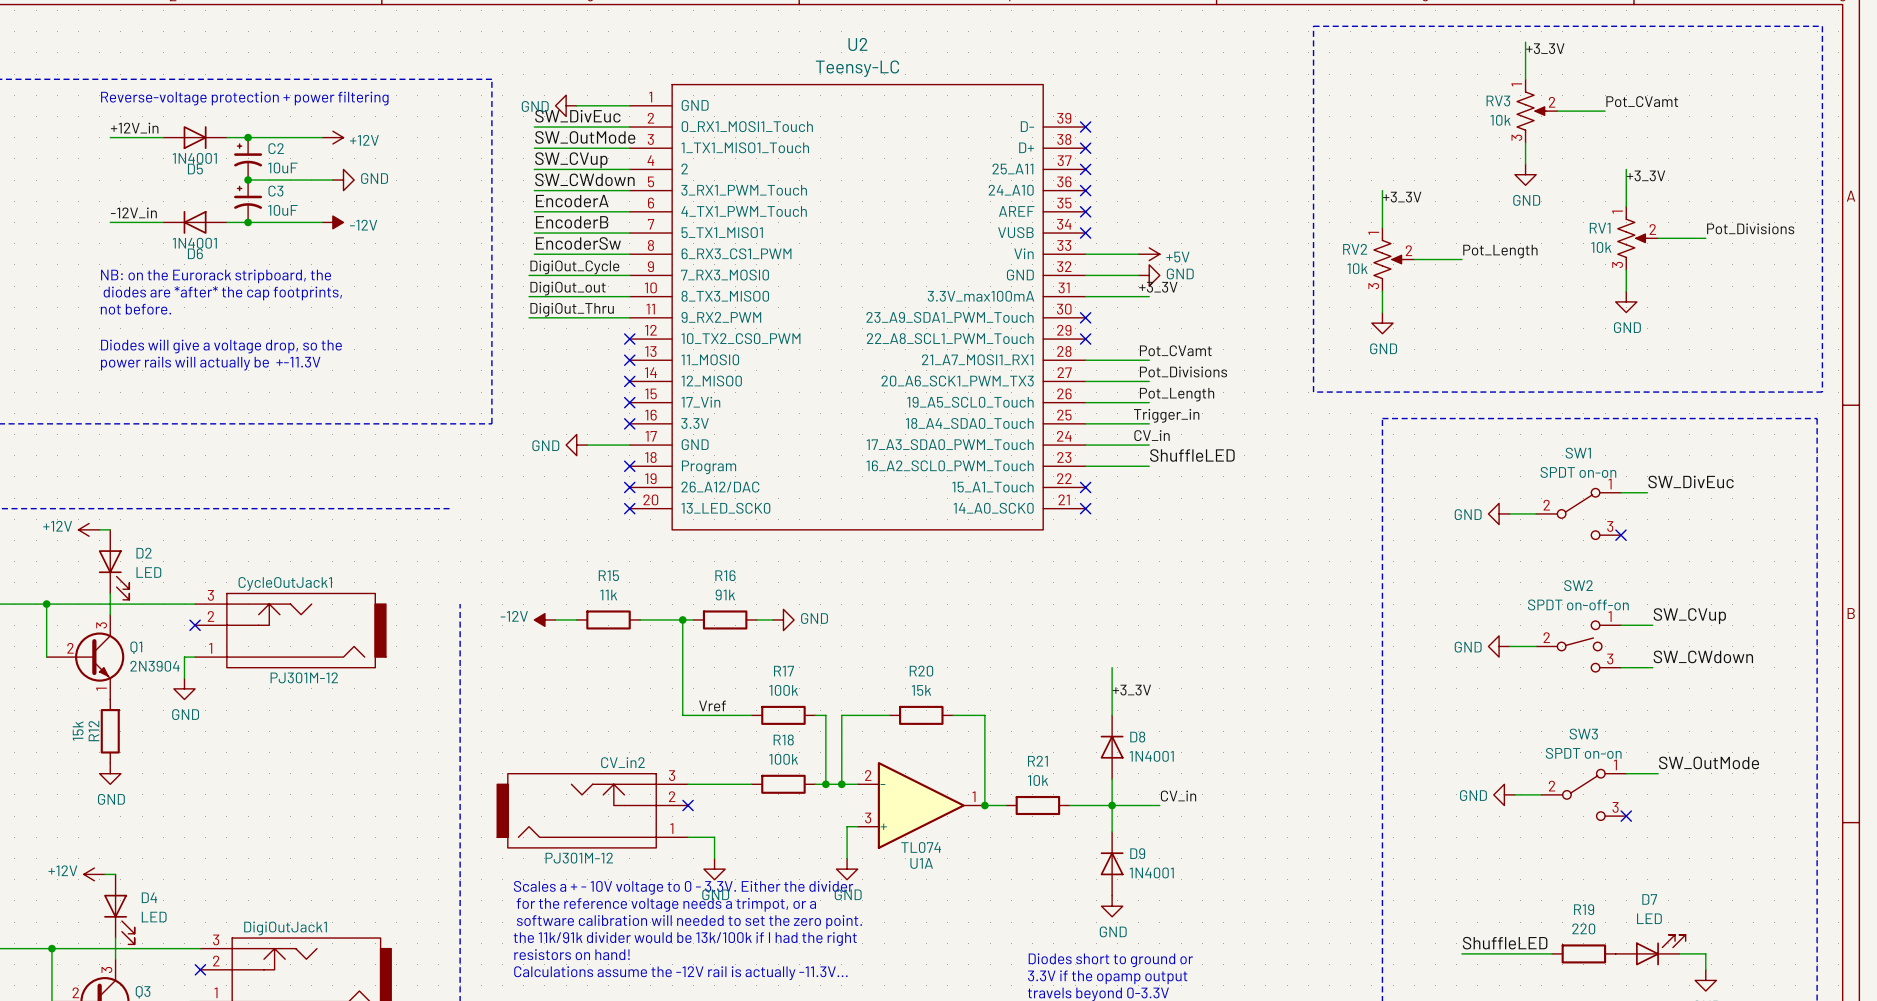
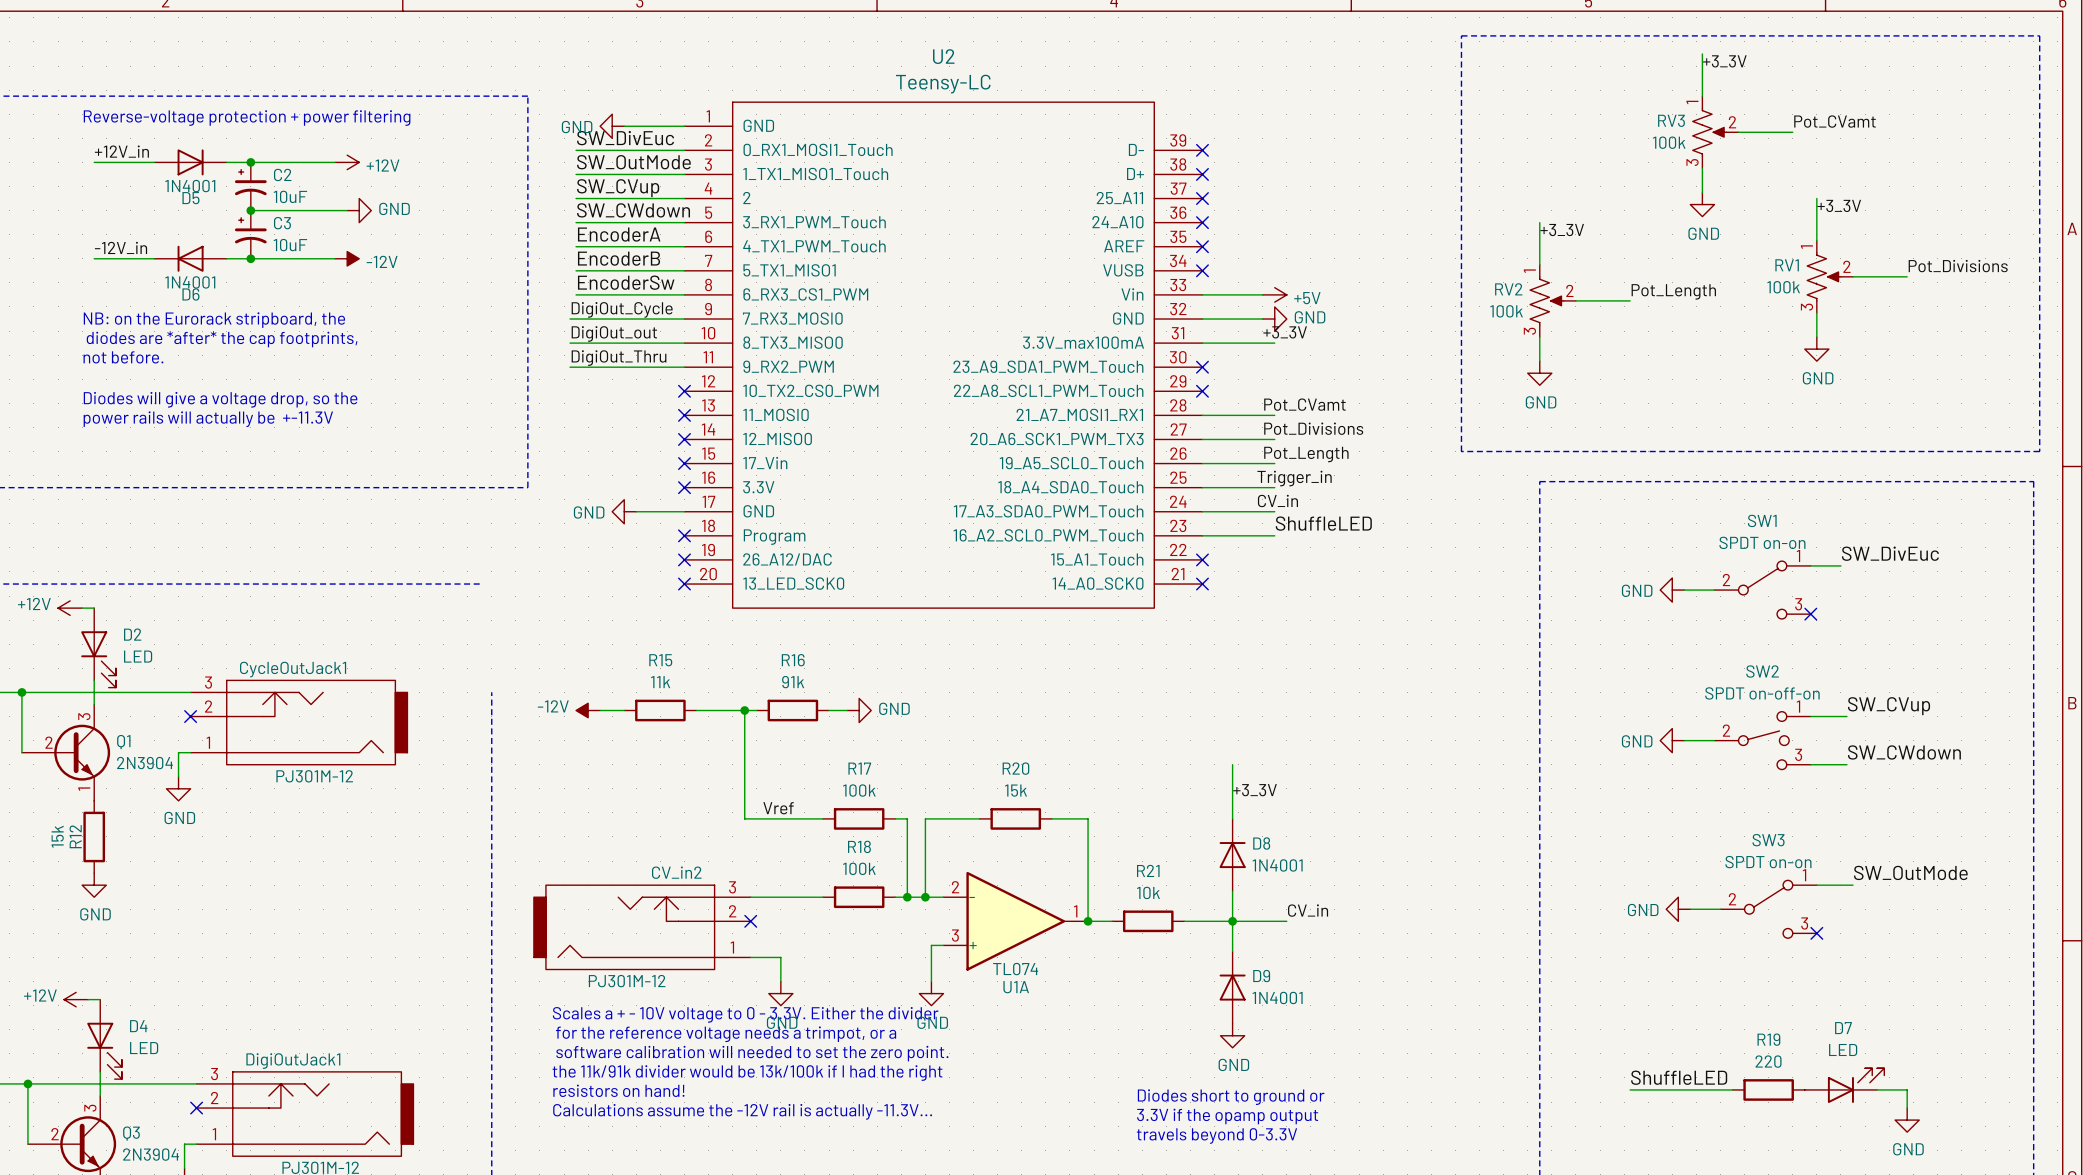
RV3 value: 10k (1500, 120) -> 100k (1669, 142)
RV1 value: 10k (1601, 247) -> 100k (1783, 287)
RV2 value: 10k (1357, 268) -> 100k (1506, 311)

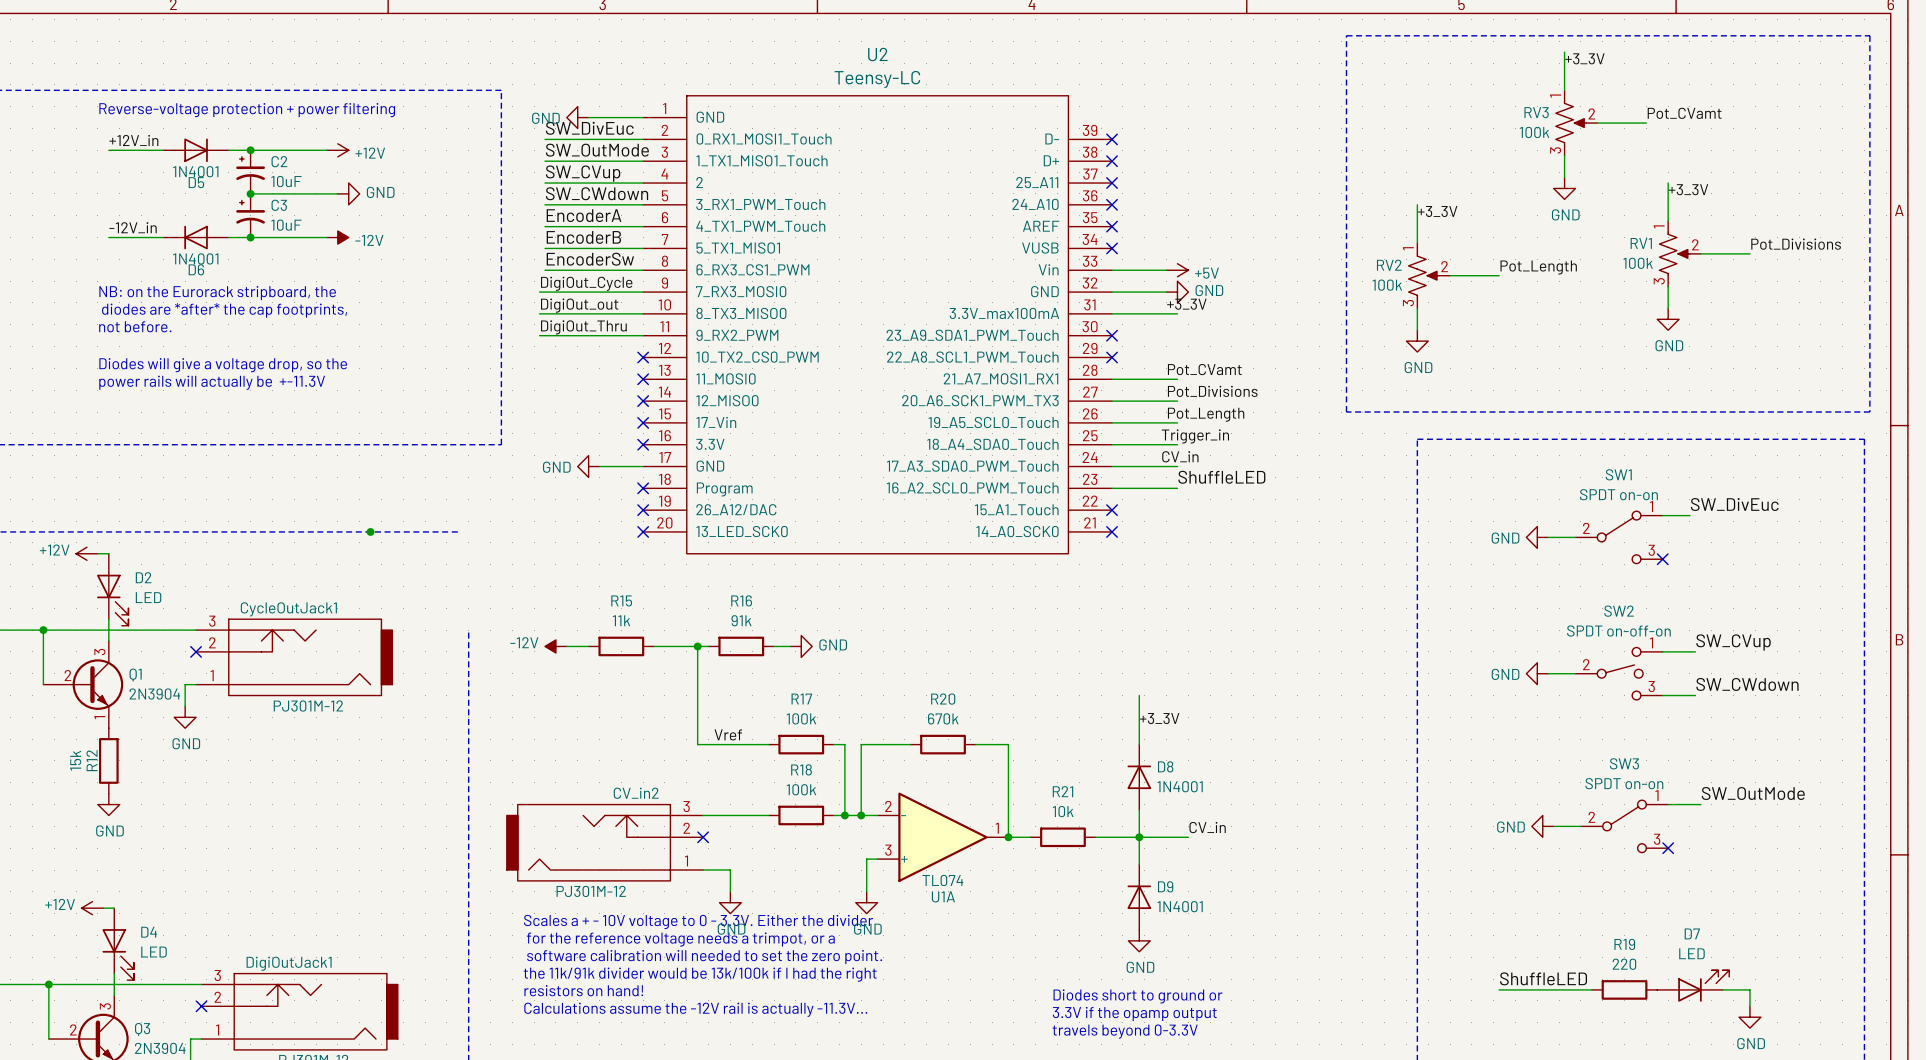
junction: none -> (370, 531)
R20 value: 15k (1015, 790) -> 670k (943, 718)

